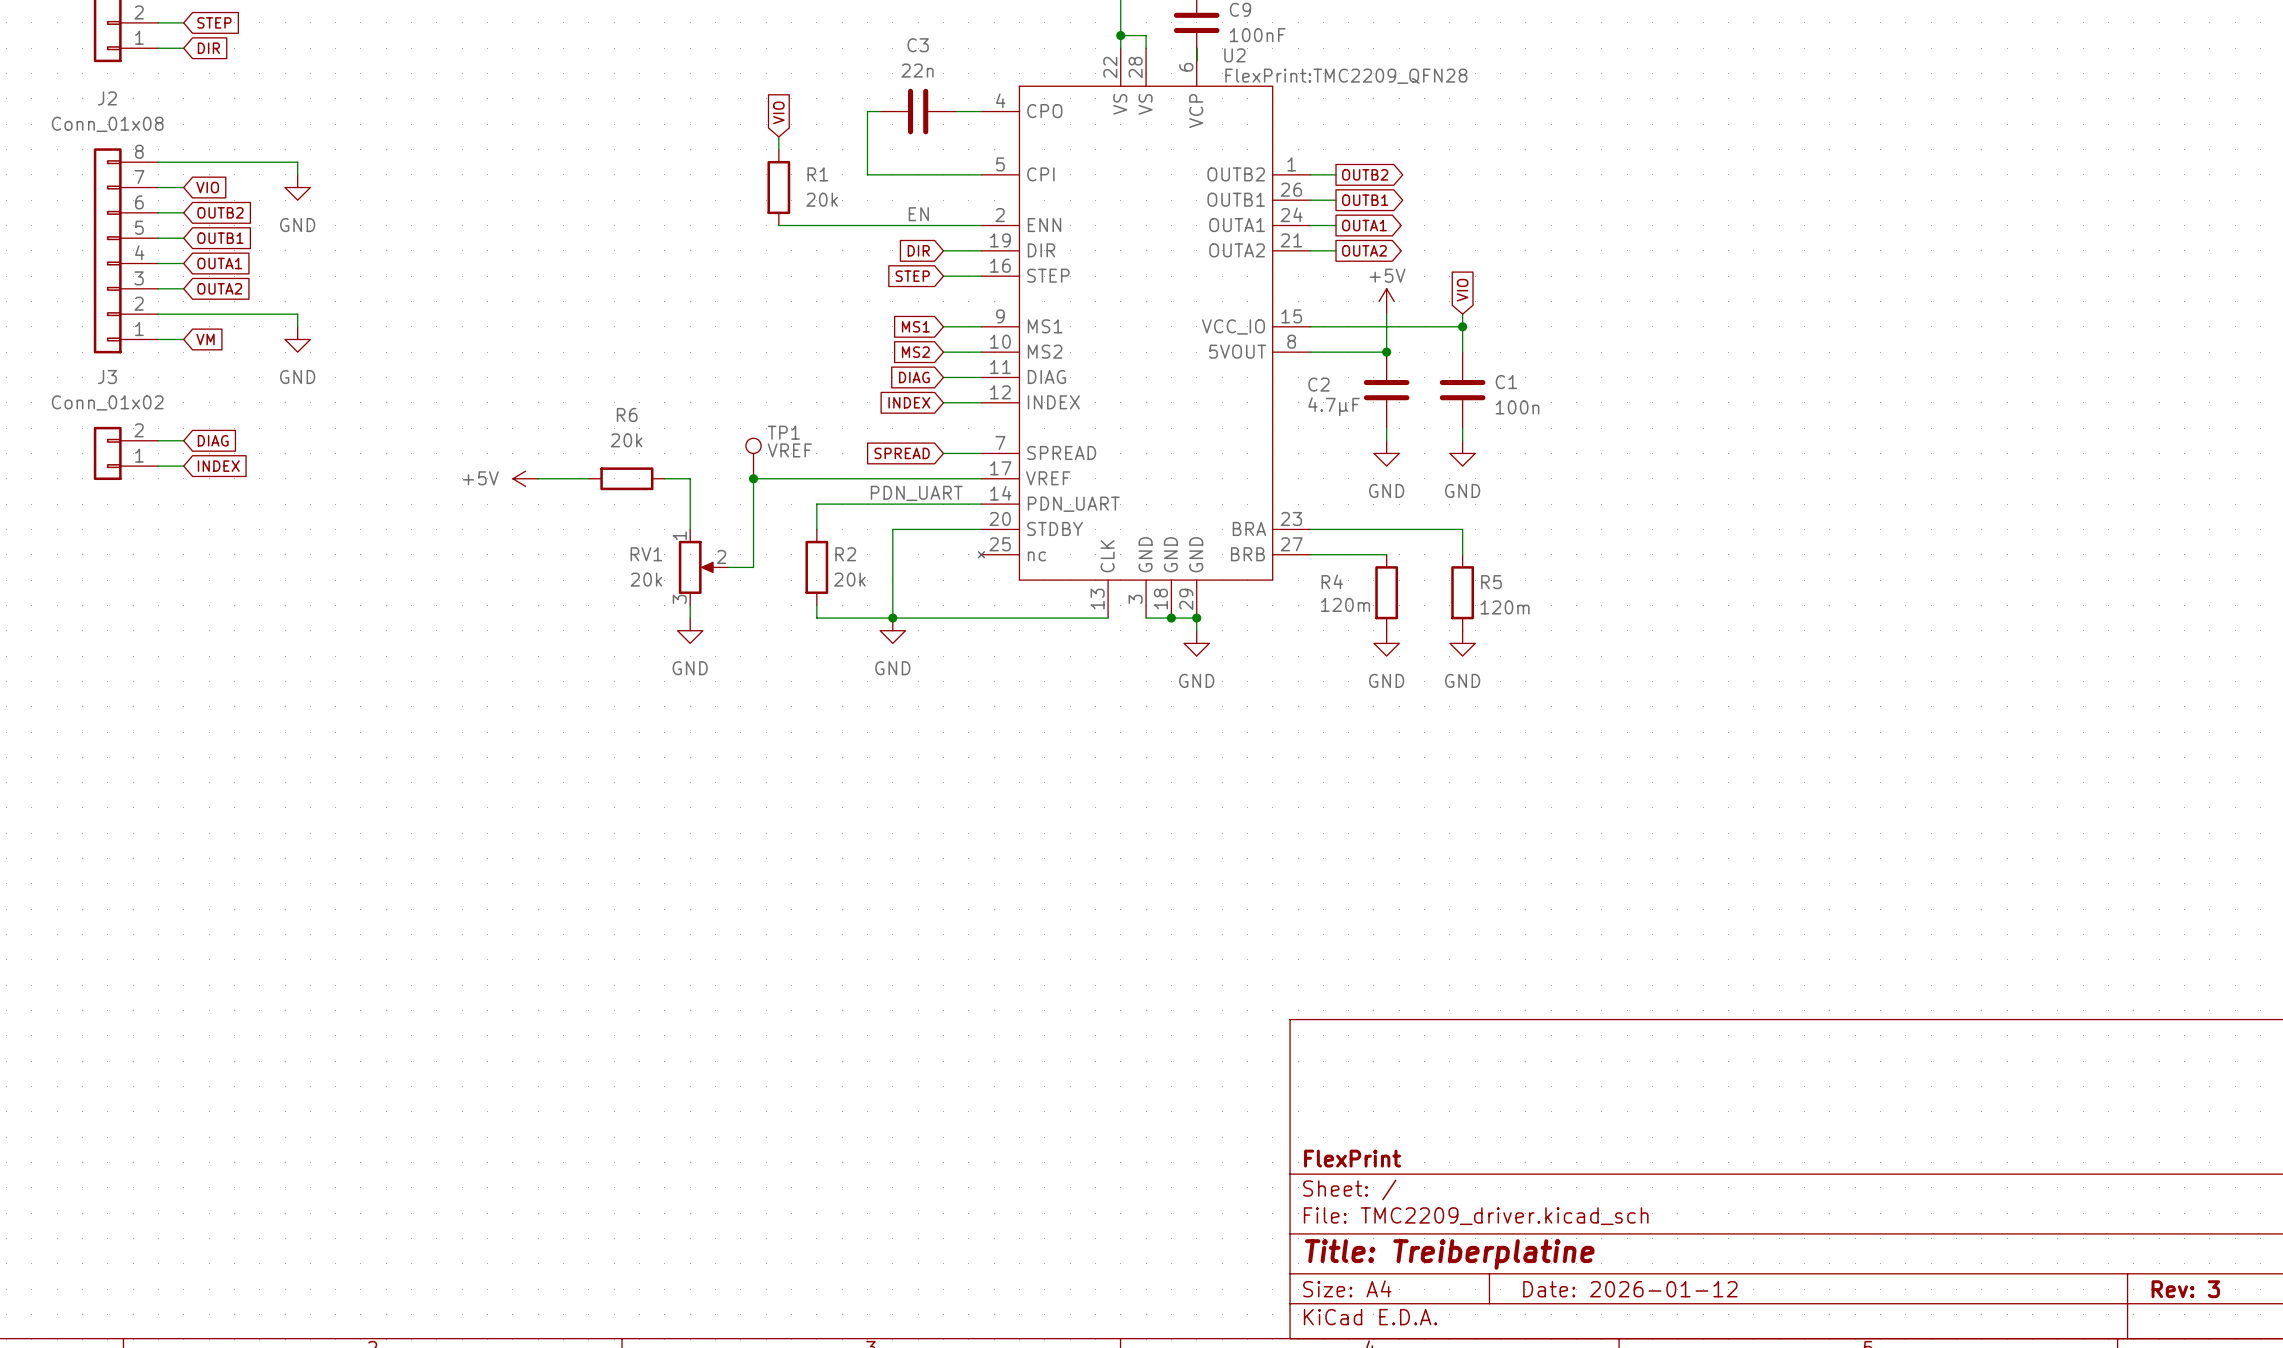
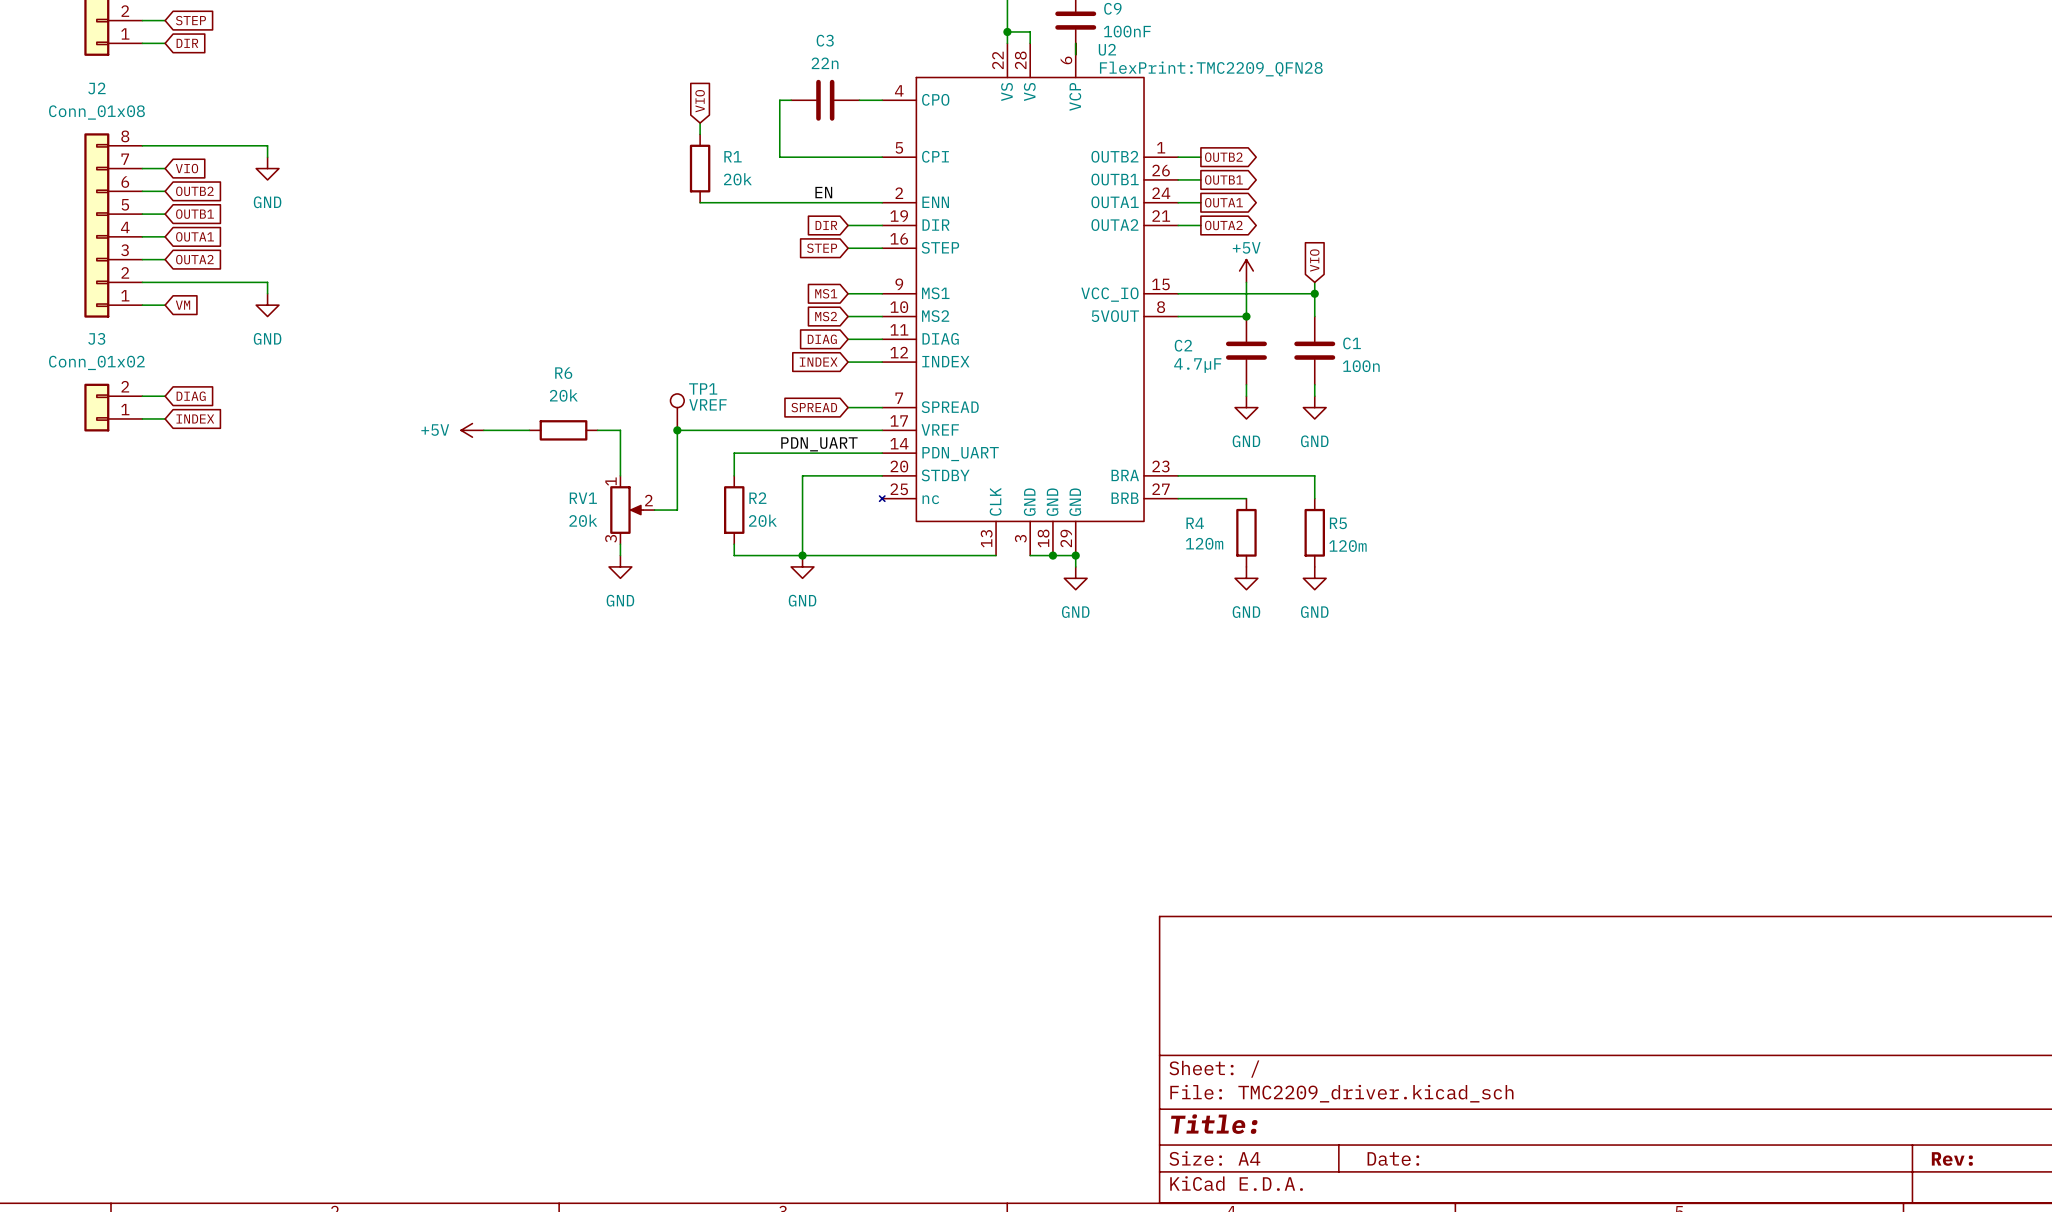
title block: FlexPrint (1352, 1158) -> none
title block: Title: Treiberplatine (1449, 1254) -> Title: (1214, 1124)
title block: Date: 2026-01-12 (1630, 1289) -> Date: (1393, 1158)
title block: Rev: 3 (2185, 1289) -> Rev: (1952, 1158)

